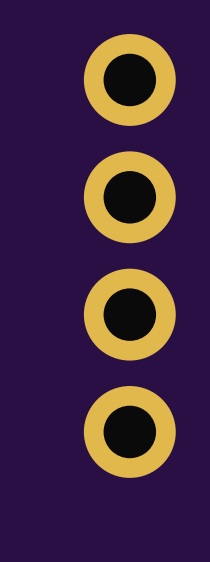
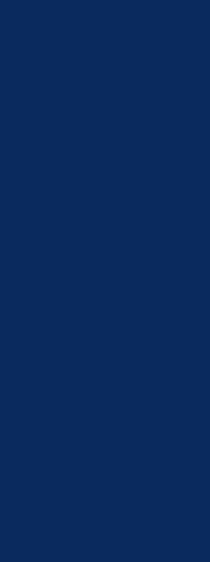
part: (129, 79) -> none
part: (129, 197) -> none
part: (129, 314) -> none
part: (129, 431) -> none

